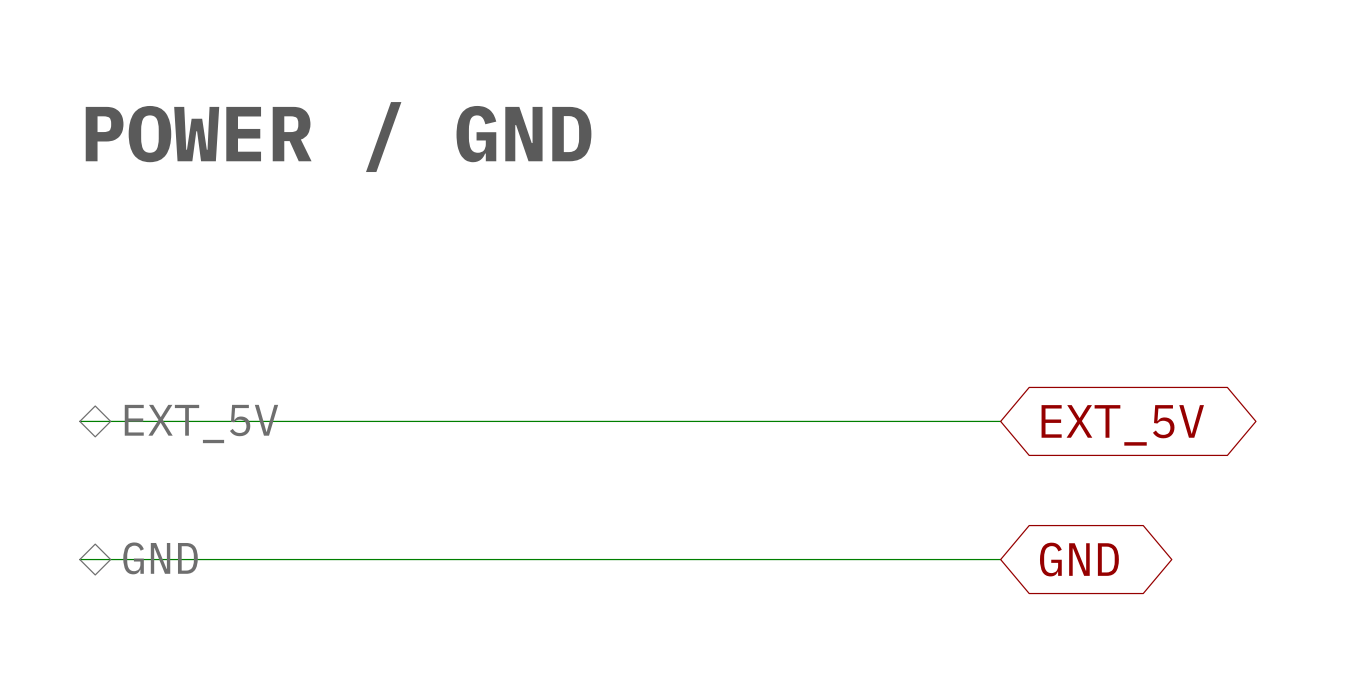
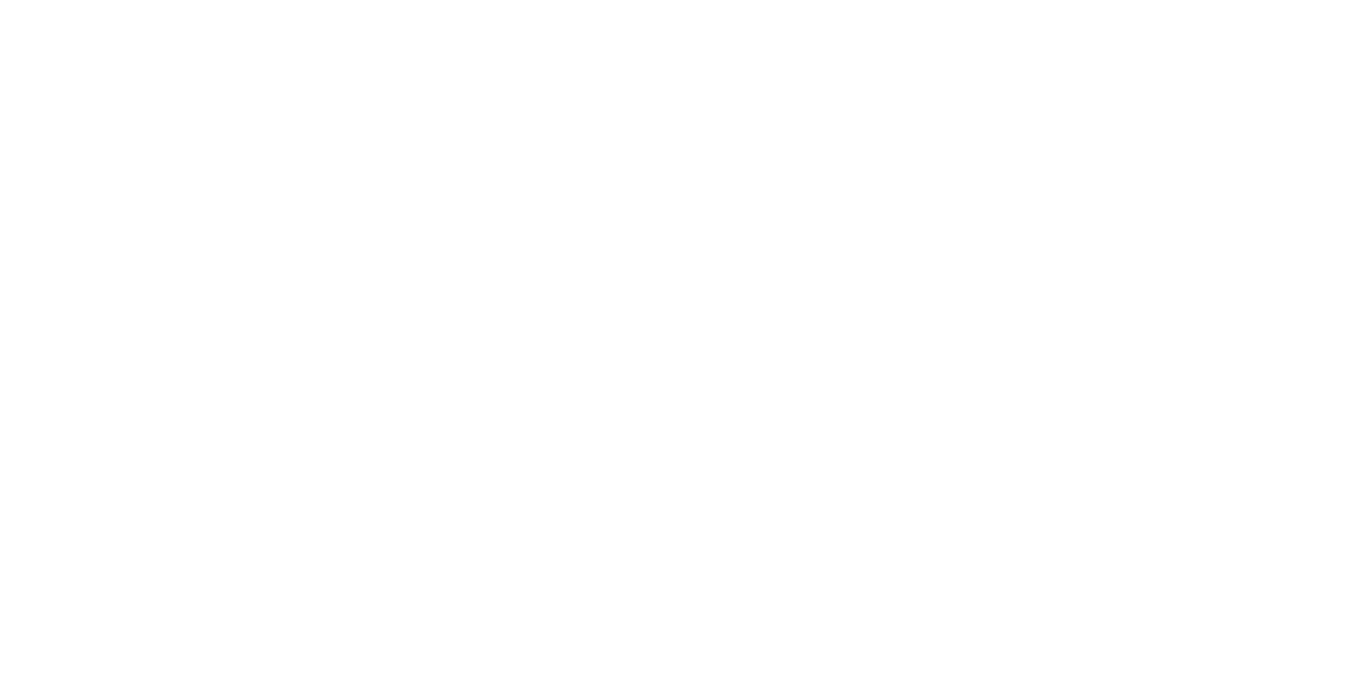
text: POWER / GND (338, 137) -> none
wire: (79, 421) (1000, 421) -> none
hierarchical label: EXT_5V (201, 424) -> none
global label: EXT_5V (1122, 425) -> none
hierarchical label: GND (160, 558) -> none
wire: (79, 559) (1000, 559) -> none
global label: GND (1079, 559) -> none

